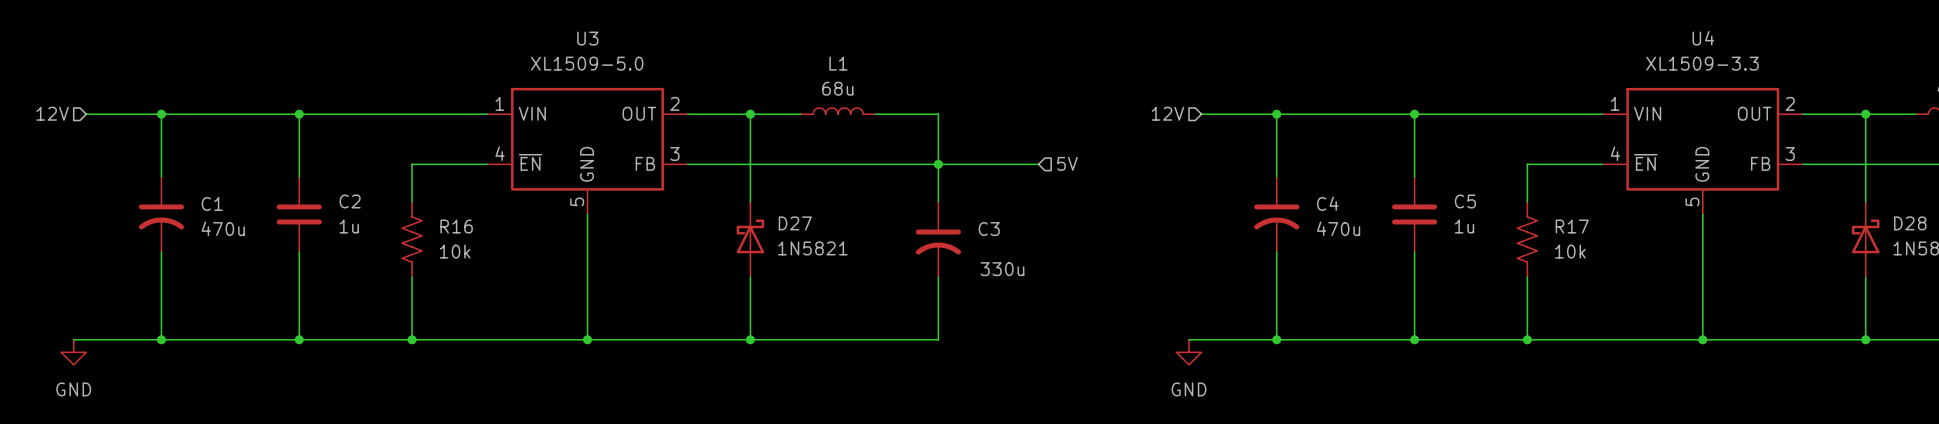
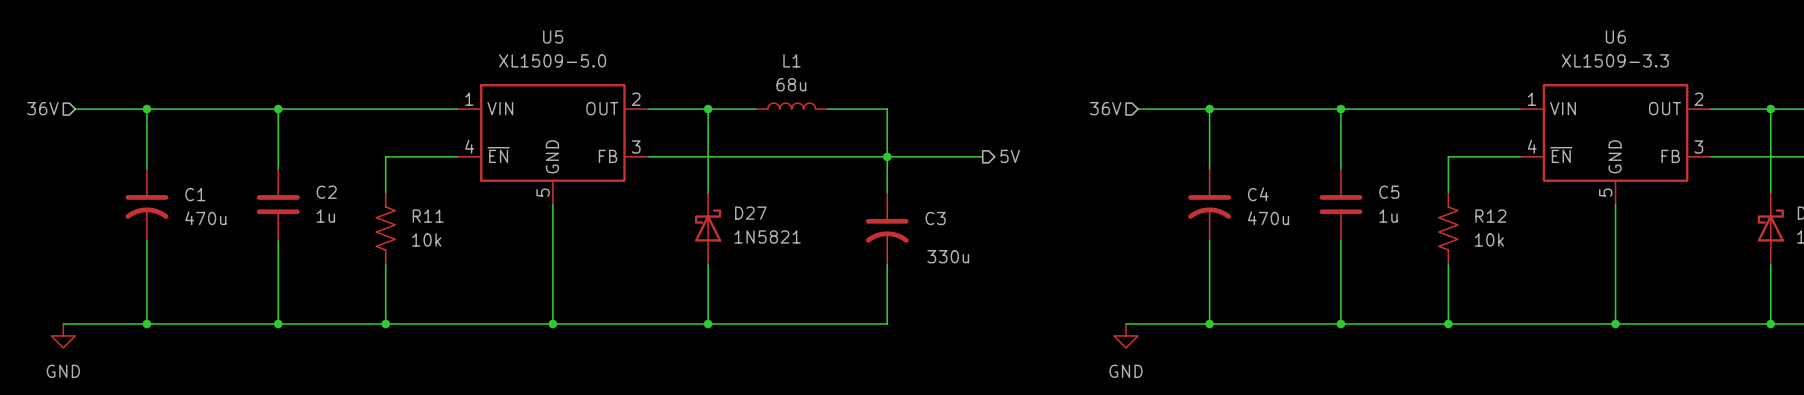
U3 name: U3 (587, 38) -> U5 (553, 36)
U4 name: U4 (1703, 38) -> U6 (1615, 36)
hierarchical label: 12V (52, 113) -> 36V (42, 108)
hierarchical label: 12V (1167, 113) -> 36V (1105, 108)
hierarchical label shape: input (1067, 163) -> output (1010, 156)
R16 name: R16 (456, 226) -> R11 (428, 216)
R17 name: R17 (1572, 226) -> R12 (1490, 216)

